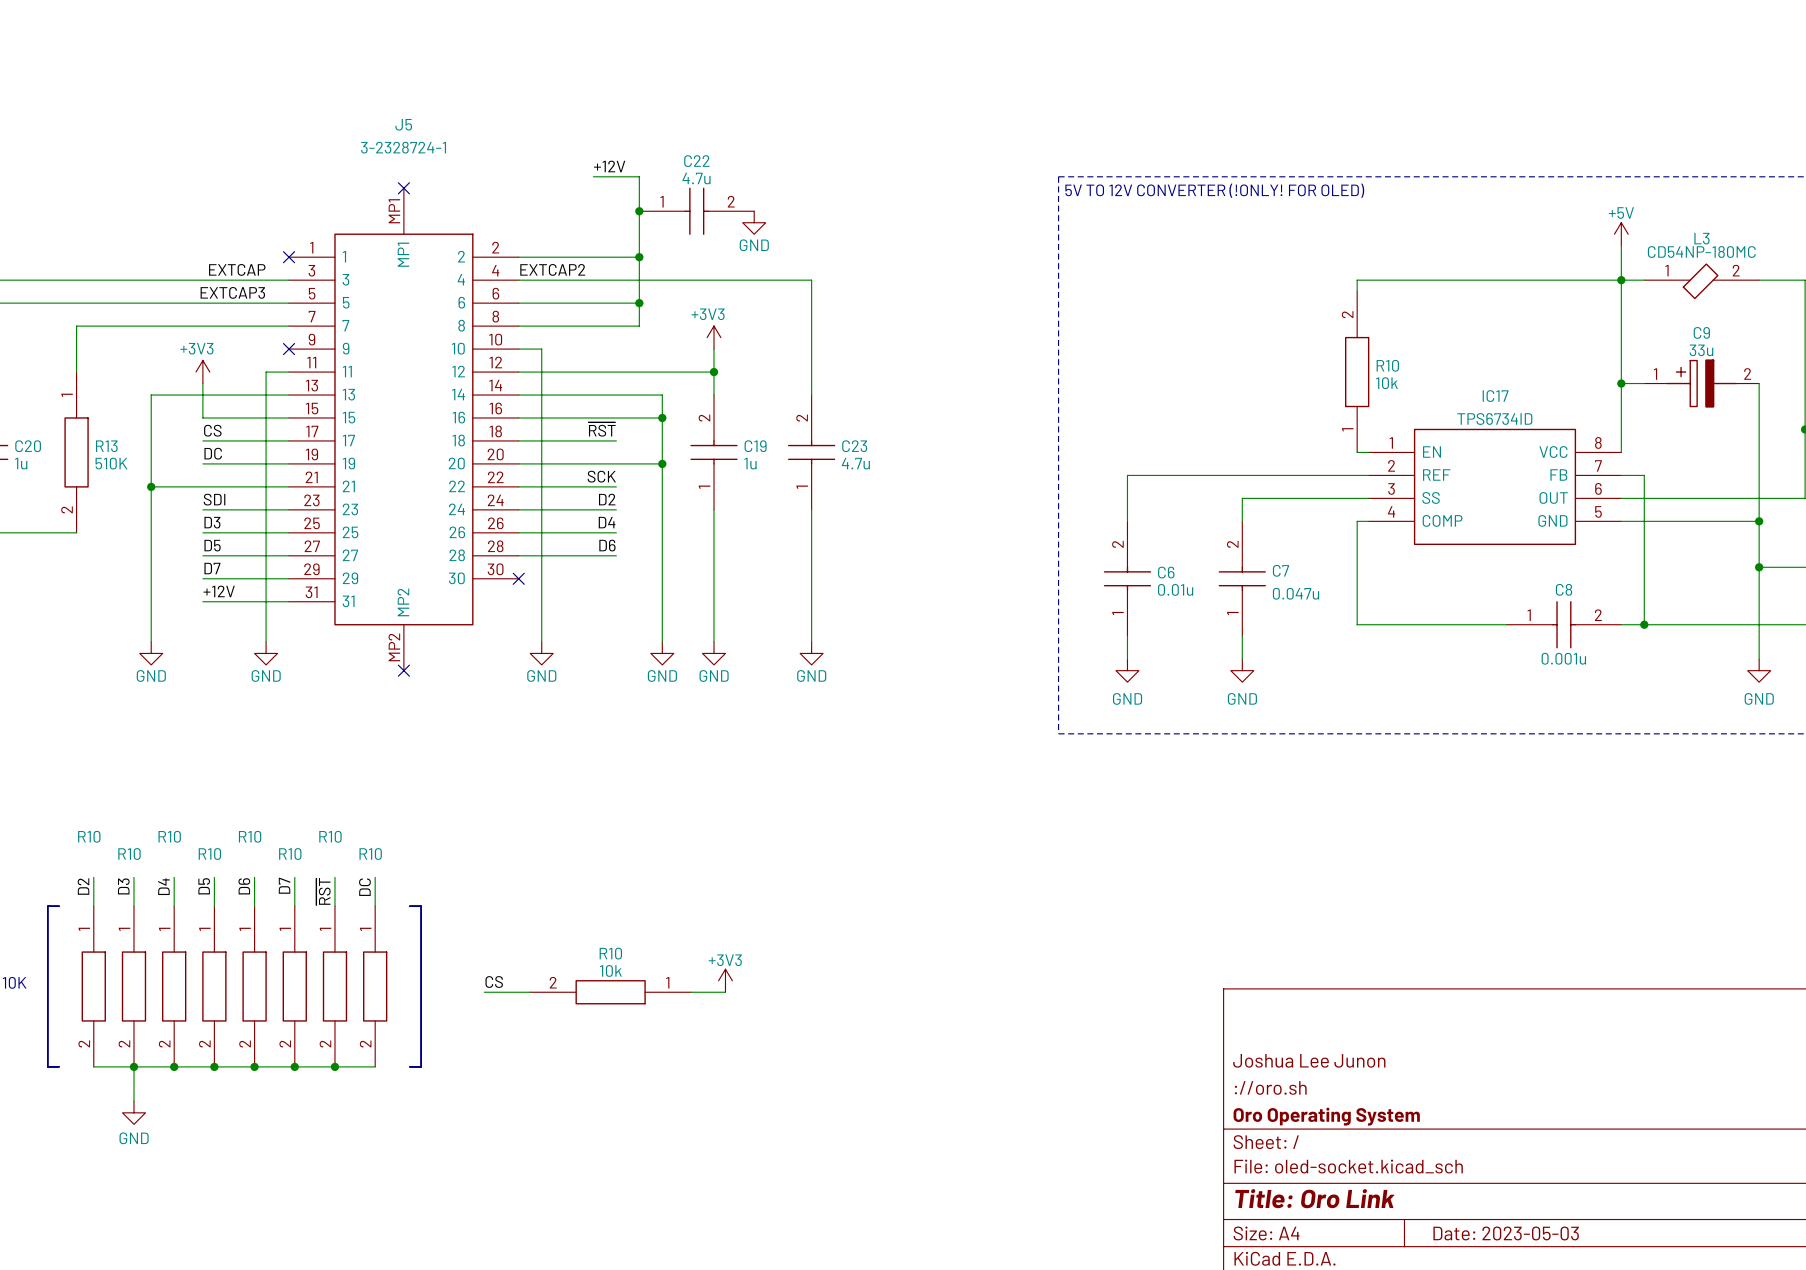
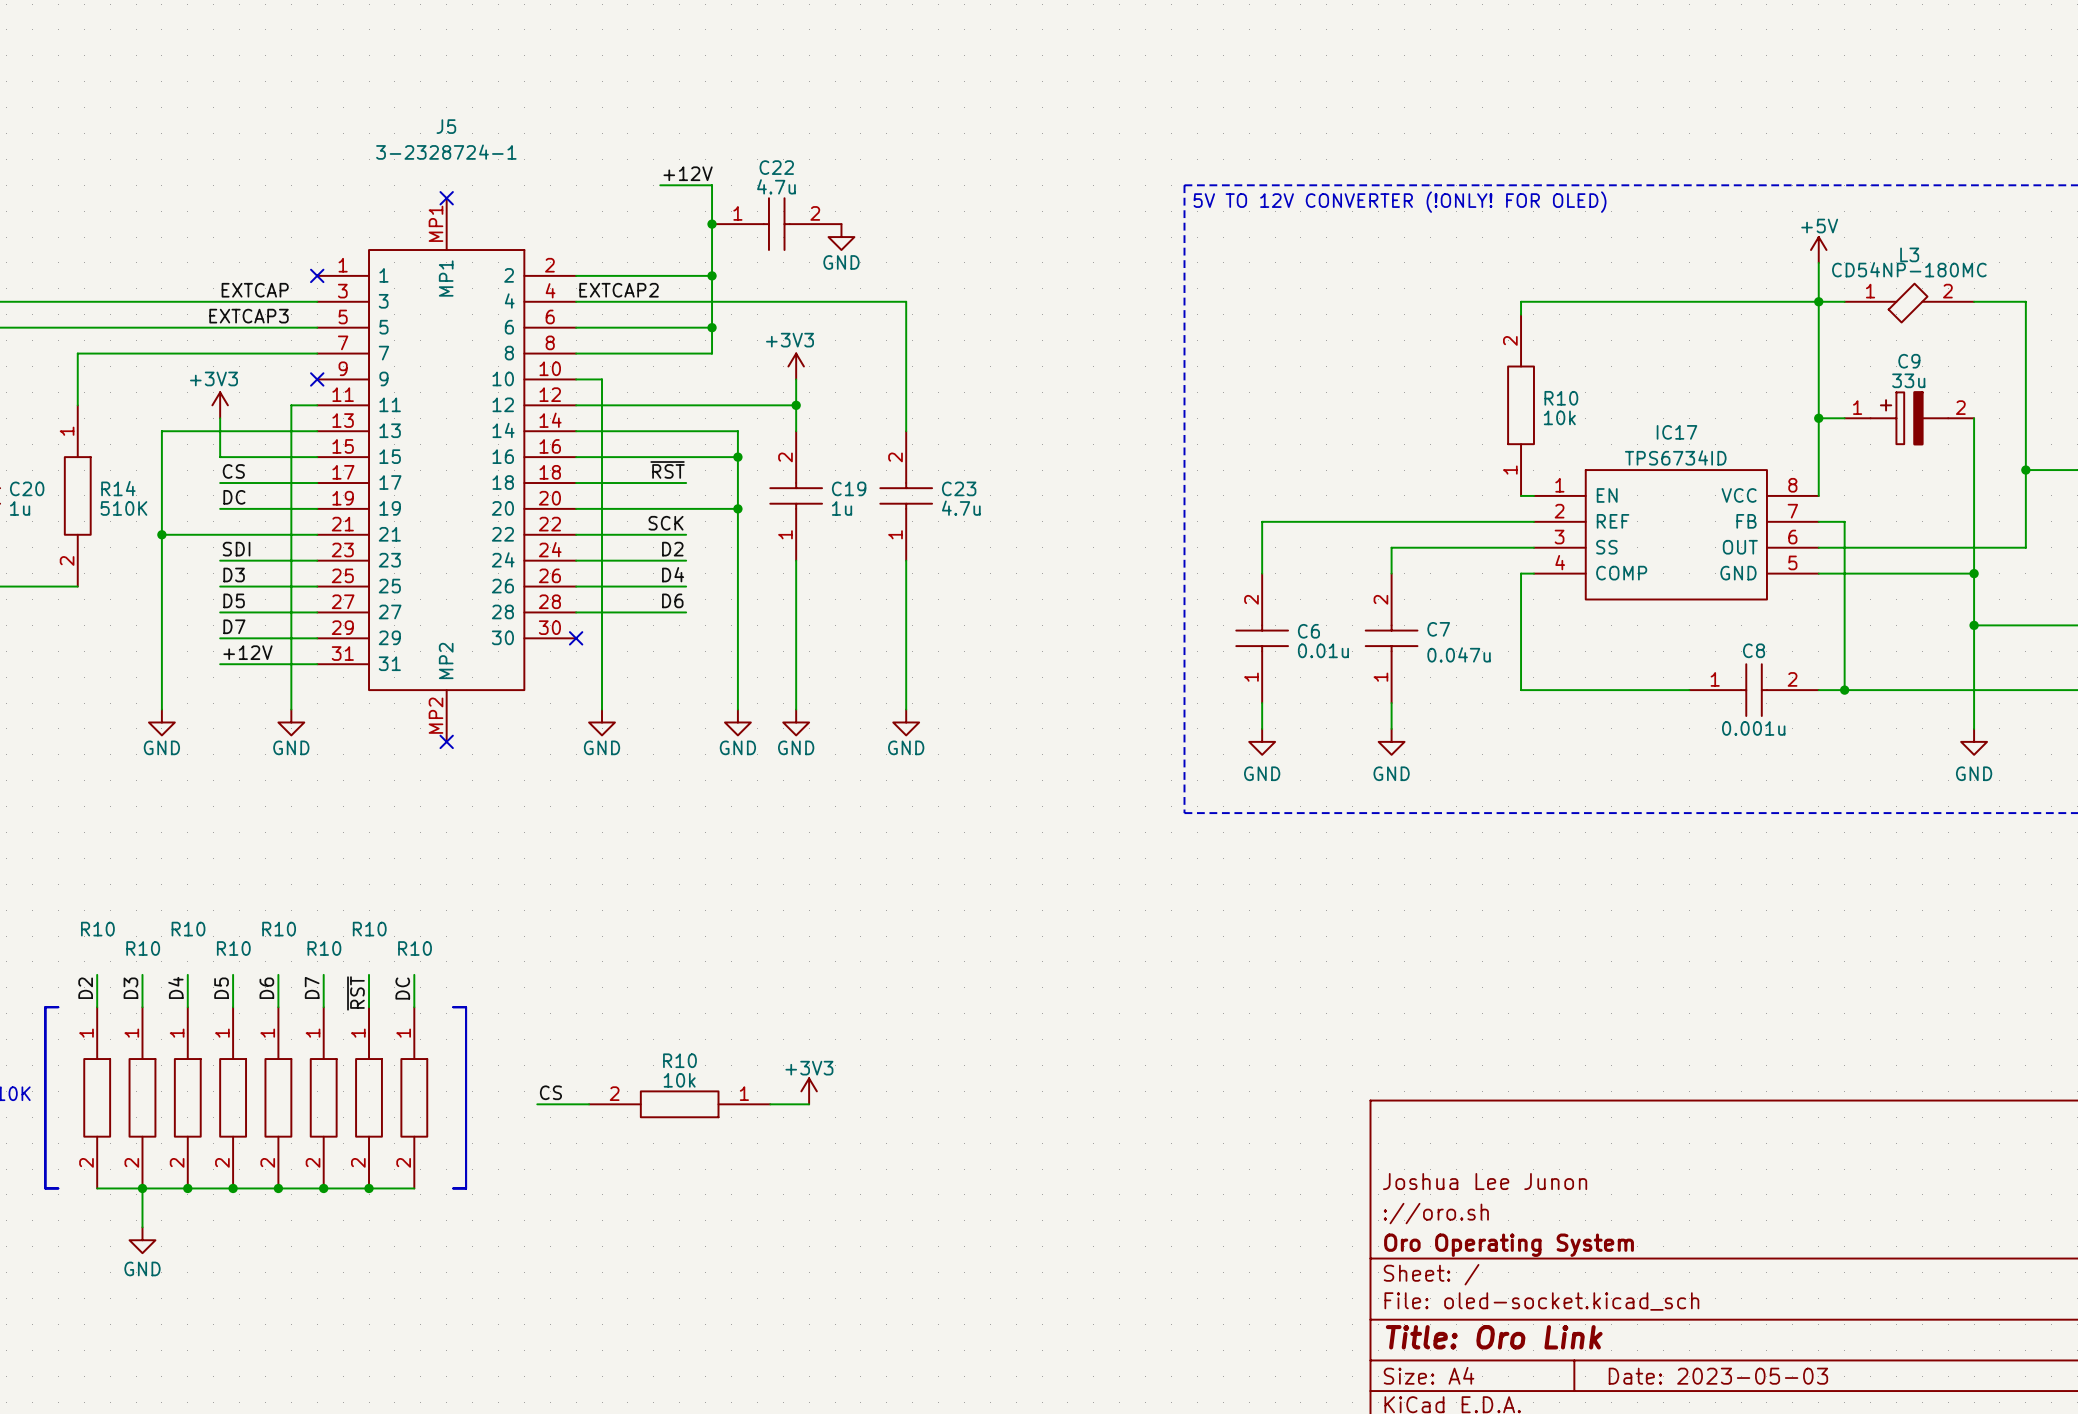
R13 name: R13 (106, 446) -> R14 (118, 488)

